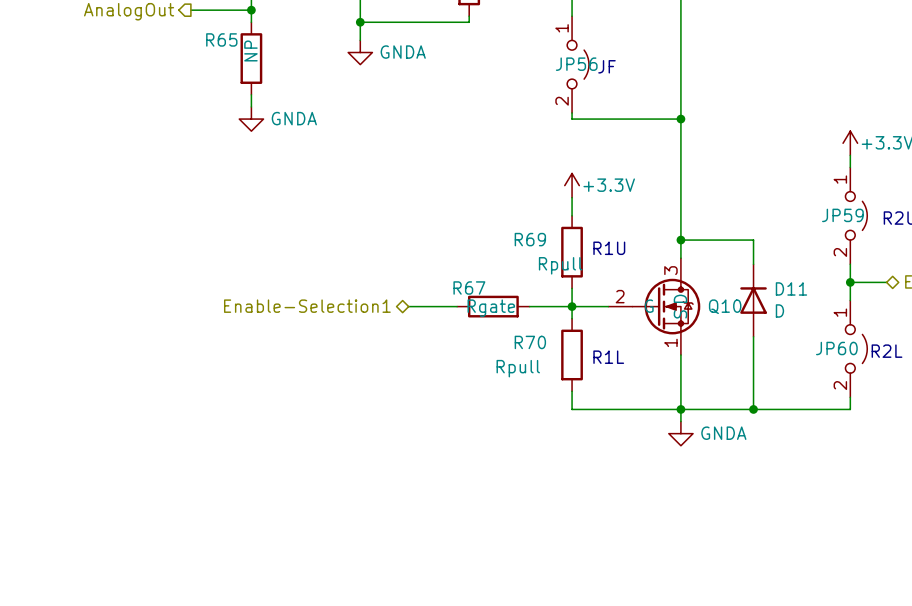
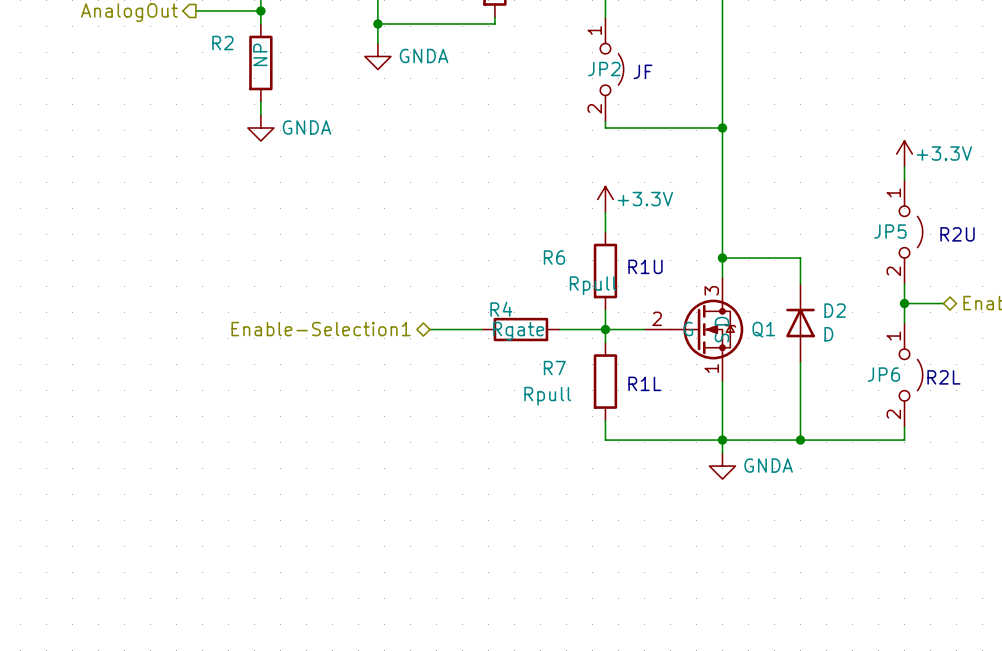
R65 name: R65 (221, 39) -> R2 (222, 43)
JP56 name: JP56 (576, 64) -> JP2 (604, 69)
JP59 name: JP59 (842, 215) -> JP5 (890, 231)
R69 name: R69 (530, 239) -> R6 (554, 257)
R67 name: R67 (469, 288) -> R4 (501, 309)
D11 name: D11 (791, 288) -> D2 (835, 310)
Q10 name: Q10 (725, 306) -> Q1 (763, 329)
R70 name: R70 (530, 342) -> R7 (554, 368)
JP60 name: JP60 (836, 348) -> JP6 (883, 374)

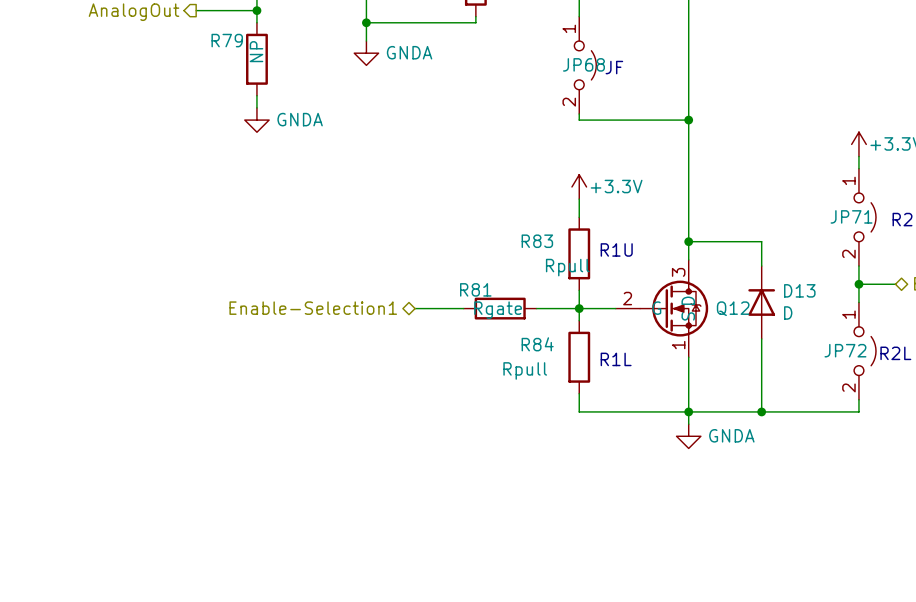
R2 name: R2 (222, 43) -> R79 (227, 40)
JP2 name: JP2 (604, 69) -> JP68 (583, 64)
JP5 name: JP5 (890, 231) -> JP71 (851, 216)
R6 name: R6 (554, 257) -> R83 (537, 241)
R4 name: R4 (501, 309) -> R81 (475, 289)
D2 name: D2 (835, 310) -> D13 (799, 290)
Q1 name: Q1 (763, 329) -> Q12 (733, 308)
R7 name: R7 (554, 368) -> R84 (537, 344)
JP6 name: JP6 (883, 374) -> JP72 (845, 350)

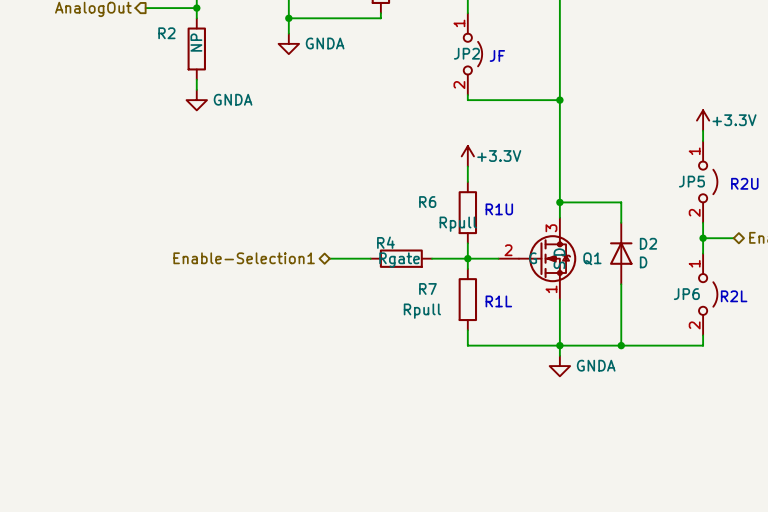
R79 name: R79 (227, 40) -> R2 (166, 33)
JP68 name: JP68 (583, 64) -> JP2 (466, 53)
JP71 name: JP71 (851, 216) -> JP5 (691, 181)
R83 name: R83 (537, 241) -> R6 (427, 202)
R81 name: R81 (475, 289) -> R4 (385, 242)
D13 name: D13 (799, 290) -> D2 (648, 243)
Q12 name: Q12 (733, 308) -> Q1 (592, 258)
R84 name: R84 (537, 344) -> R7 (427, 288)
JP72 name: JP72 (845, 350) -> JP6 (686, 294)

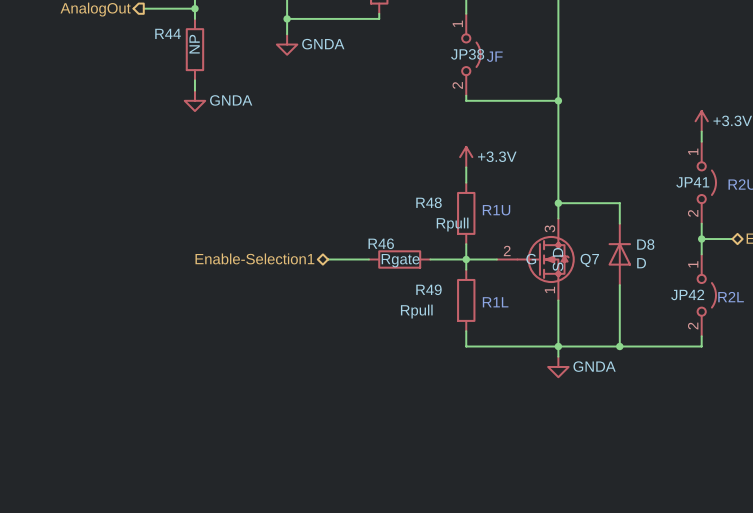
R2 name: R2 (166, 33) -> R44 (168, 33)
JP2 name: JP2 (466, 53) -> JP38 (467, 54)
JP5 name: JP5 (691, 181) -> JP41 (692, 182)
R6 name: R6 (427, 202) -> R48 (429, 202)
R4 name: R4 (385, 242) -> R46 (381, 243)
D2 name: D2 (648, 243) -> D8 (645, 244)
Q1 name: Q1 (592, 258) -> Q7 (589, 260)
R7 name: R7 (427, 288) -> R49 (428, 289)
JP6 name: JP6 (686, 294) -> JP42 (687, 294)

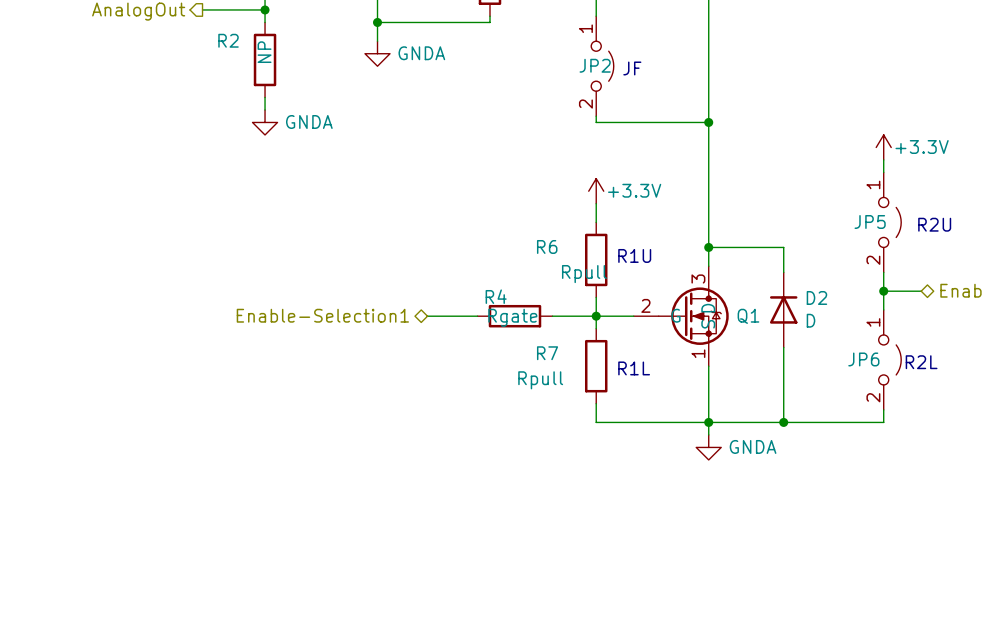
R44 name: R44 (168, 33) -> R2 (228, 40)
JP38 name: JP38 (467, 54) -> JP2 (595, 65)
JP41 name: JP41 (692, 182) -> JP5 (870, 221)
R48 name: R48 (429, 202) -> R6 (547, 246)
R46 name: R46 (381, 243) -> R4 (496, 296)
D8 name: D8 (645, 244) -> D2 (816, 297)
Q7 name: Q7 (589, 260) -> Q1 (748, 316)
R49 name: R49 (428, 289) -> R7 (547, 353)
JP42 name: JP42 (687, 294) -> JP6 (863, 359)

